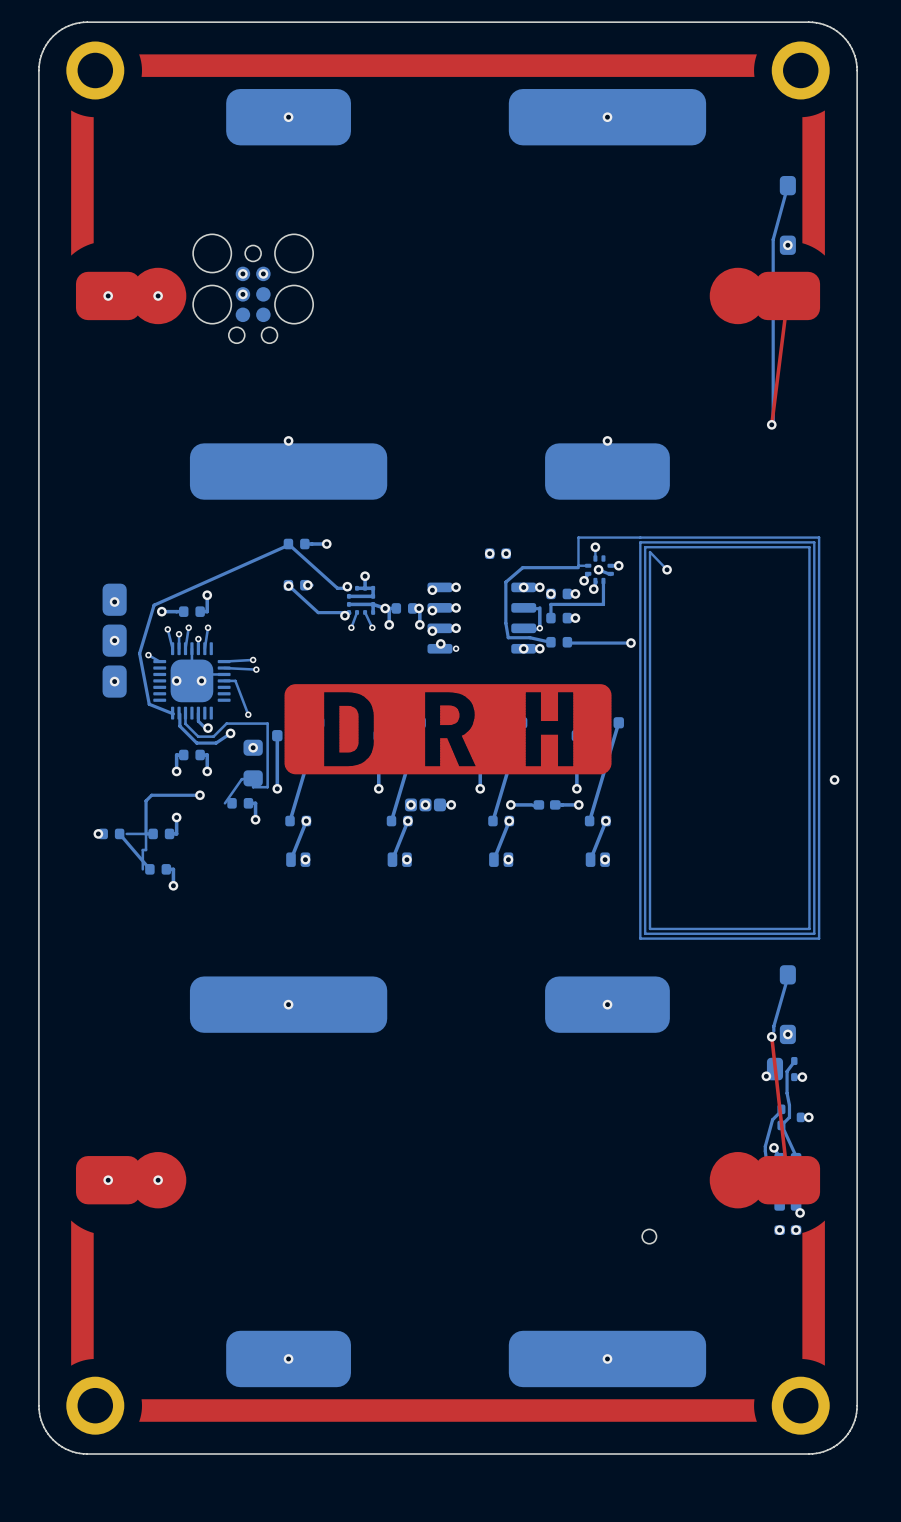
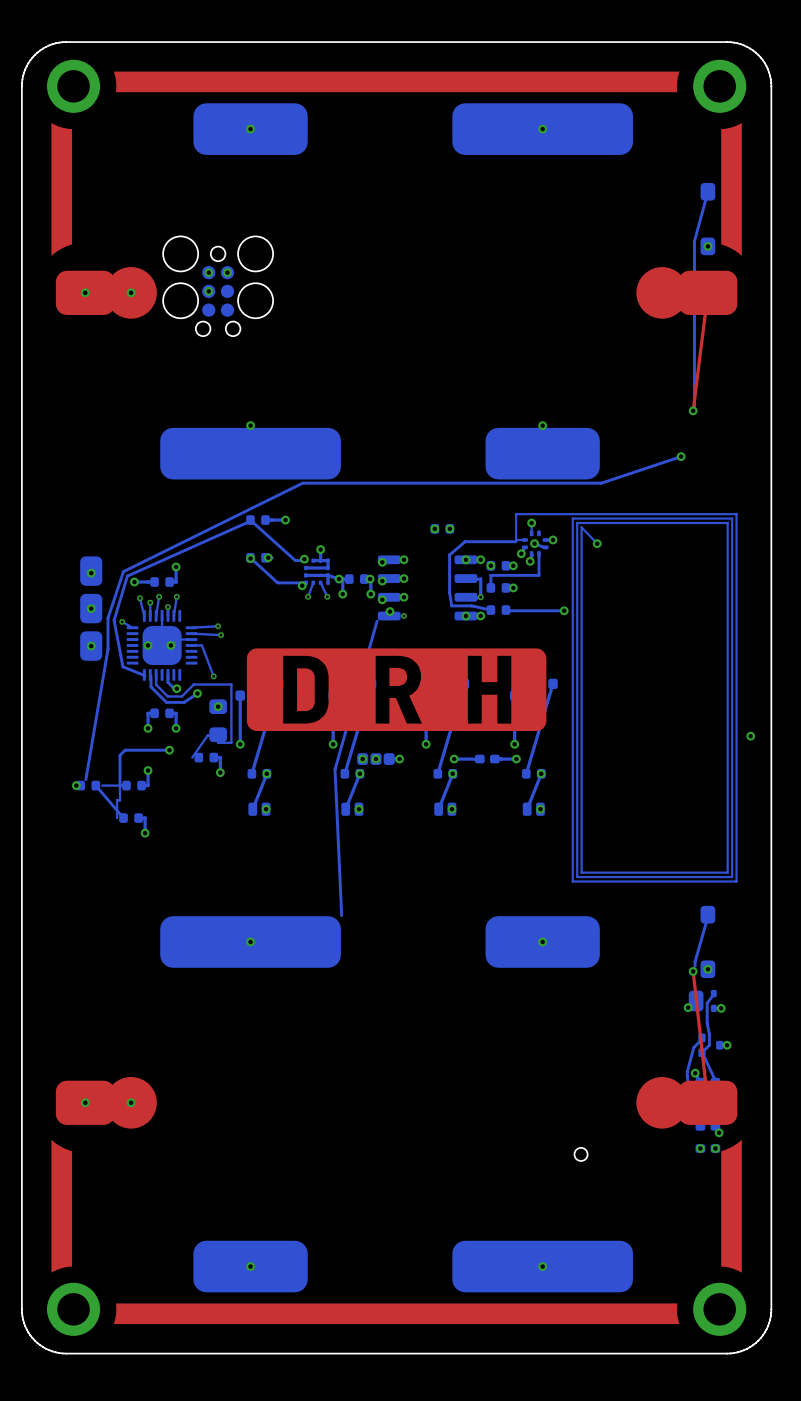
bottom track: none -> (681, 456) (601, 483) (302, 483) (123, 571) (107, 618) (107, 649) (85, 779)
via: none -> (681, 456)
bottom track: none -> (377, 621) (335, 769) (341, 915)

